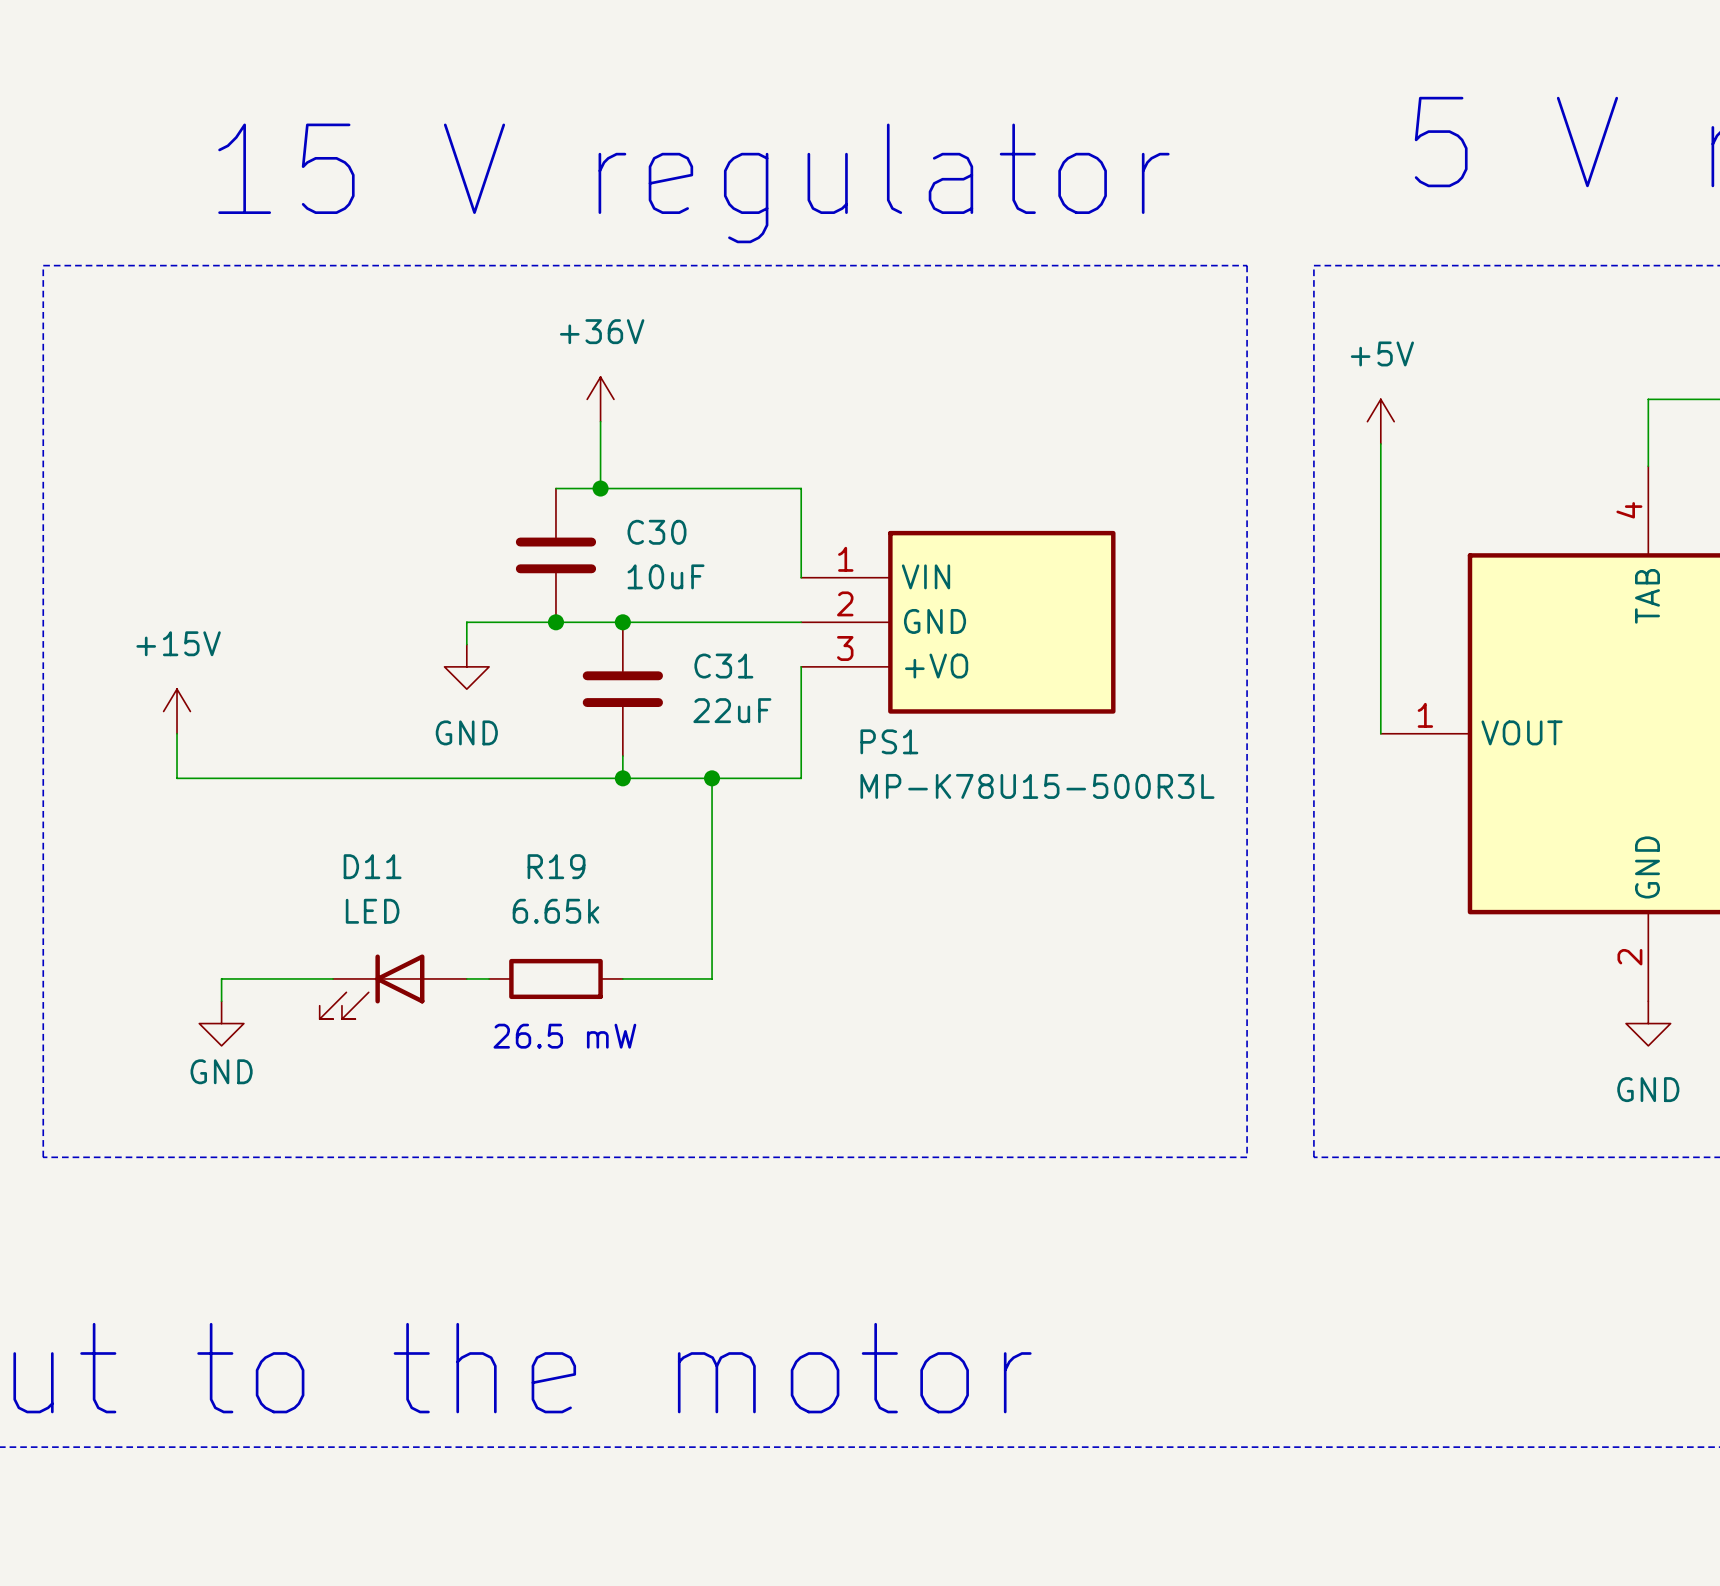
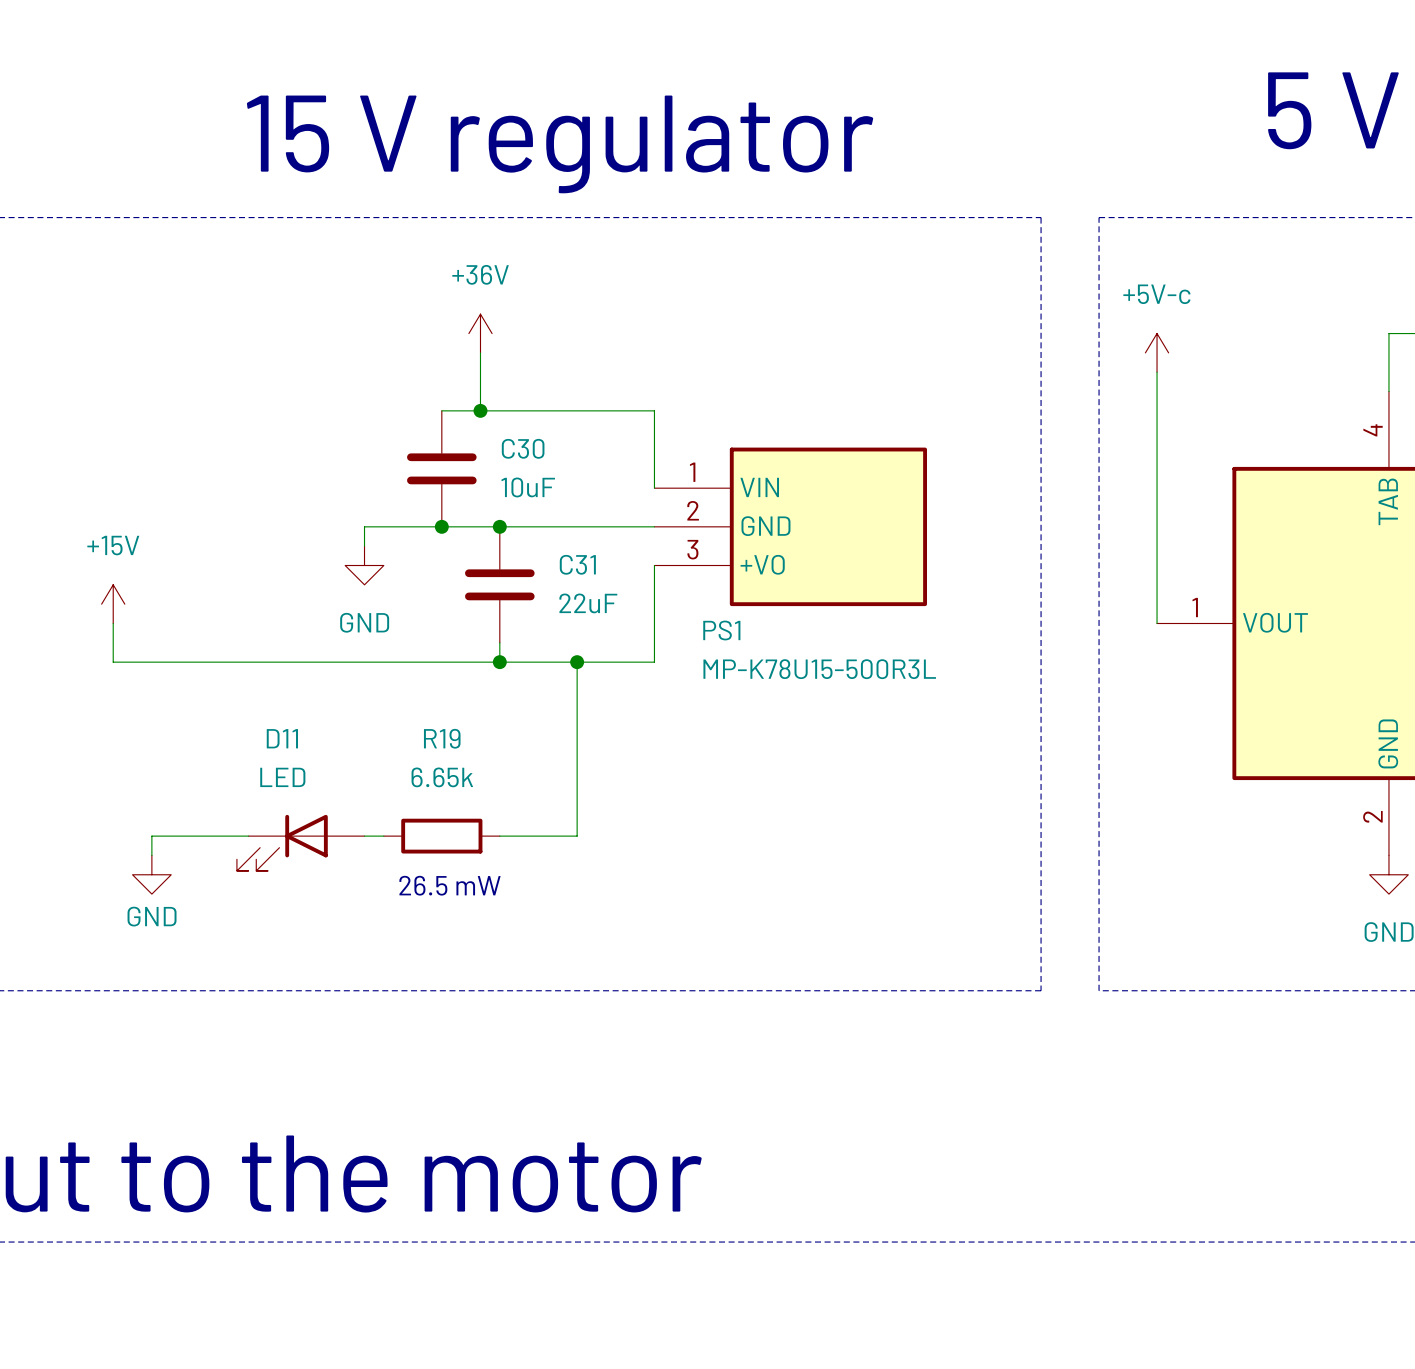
power symbol: +5V (1380, 421) -> +5V-c (1157, 352)

